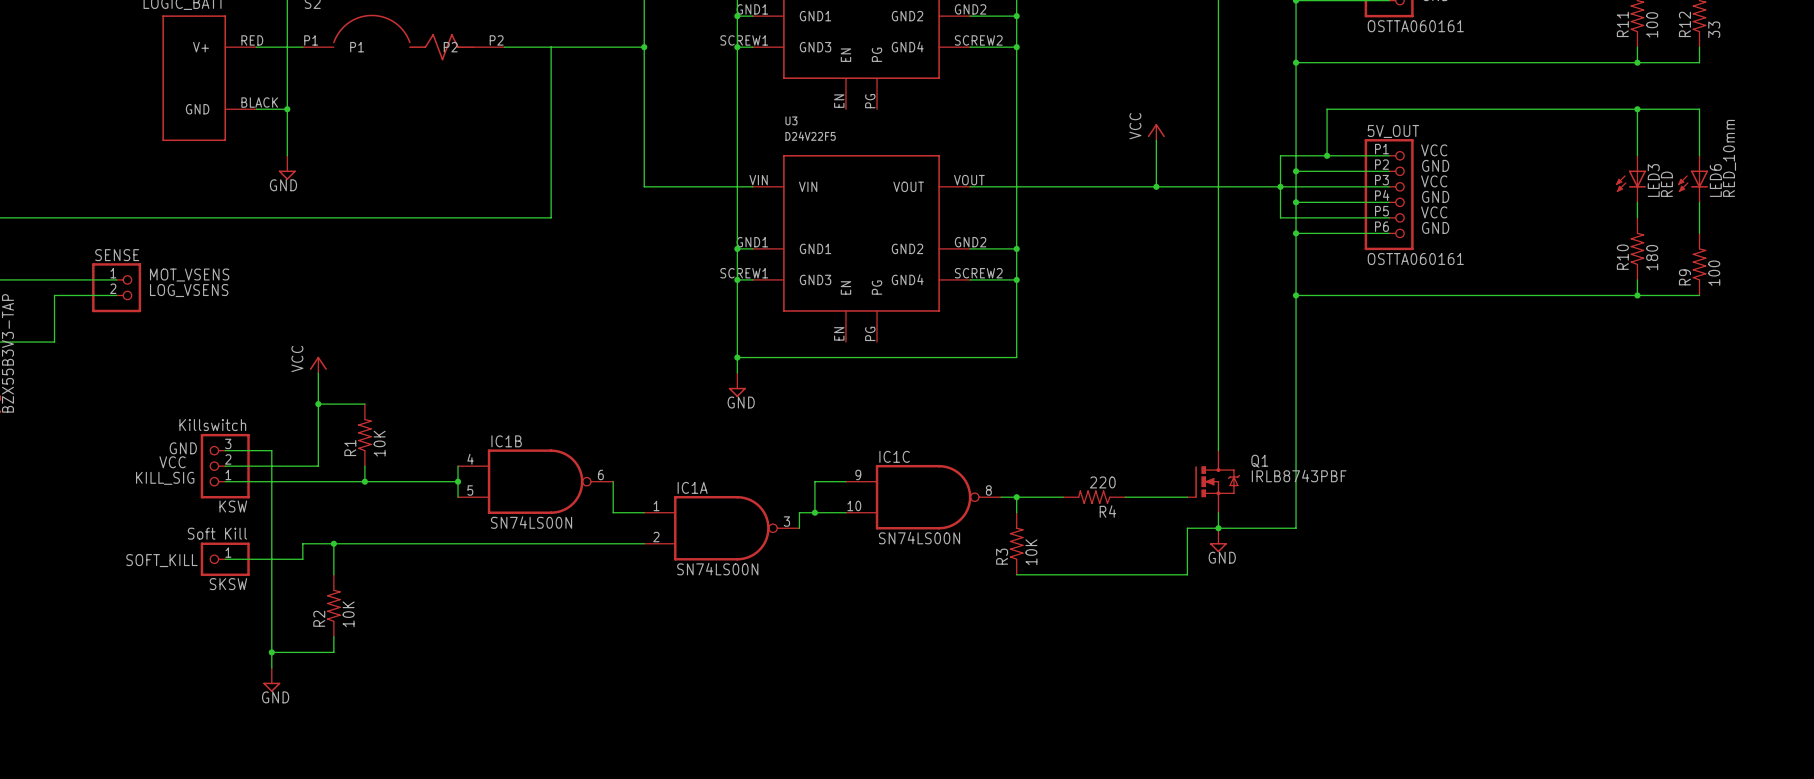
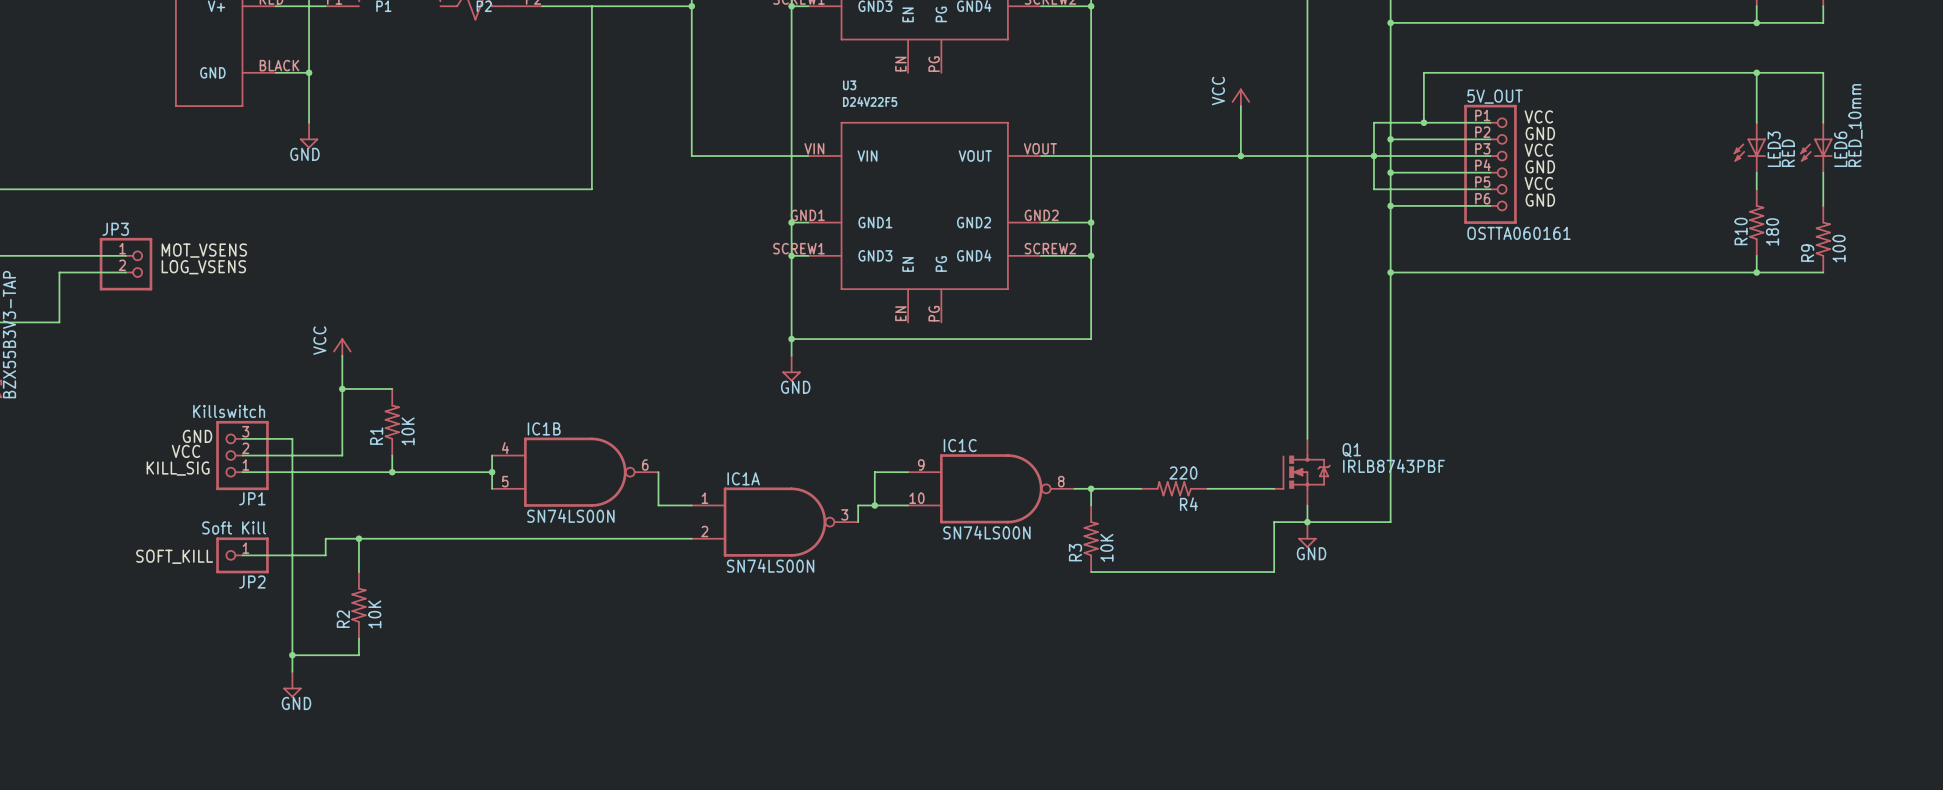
SENSE name: SENSE (117, 255) -> JP3 (115, 229)
KSW name: KSW (233, 506) -> JP1 (252, 498)
SKSW name: SKSW (228, 584) -> JP2 (252, 582)

